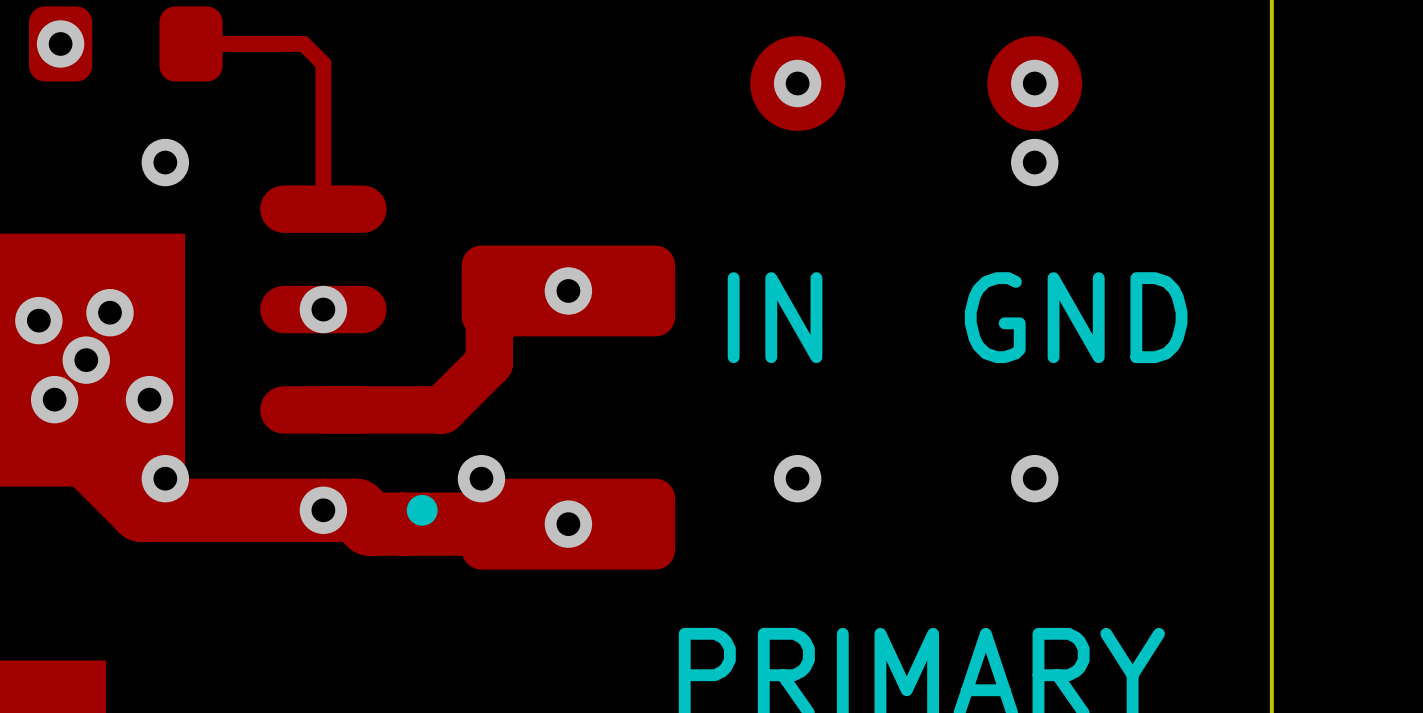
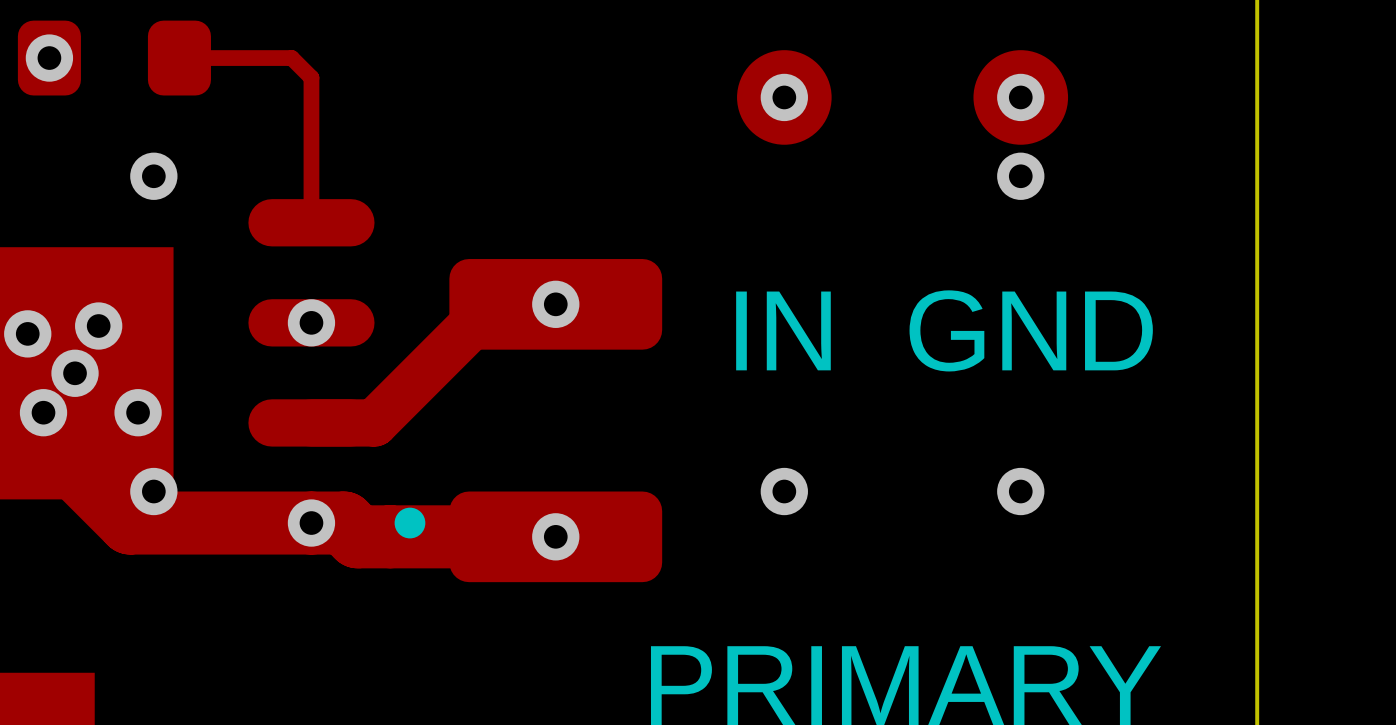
track: (517, 290) (489, 319) (489, 362) (441, 409) (386, 409) -> (505, 304) (492, 304) (374, 422)
via: (481, 478) -> none

